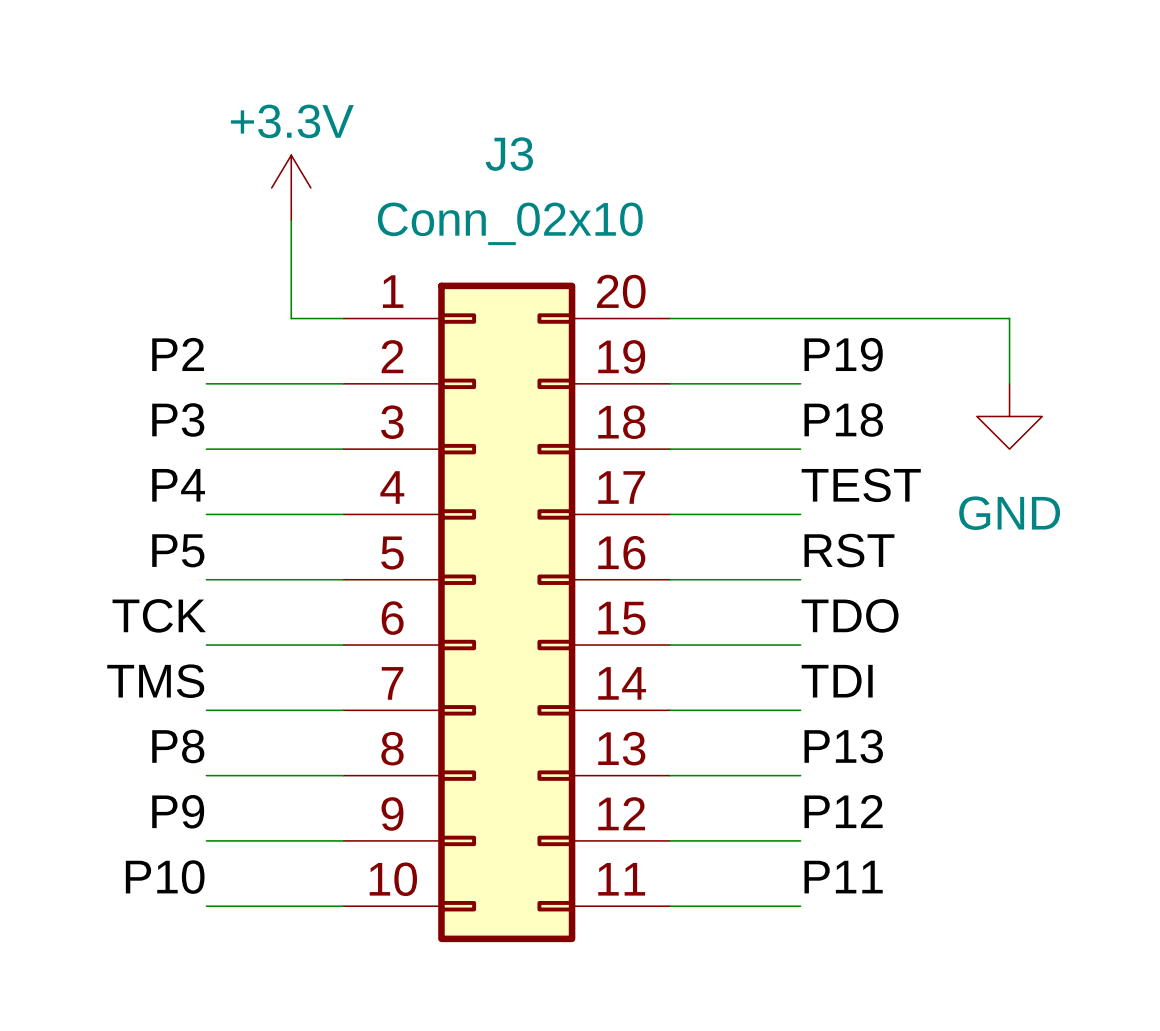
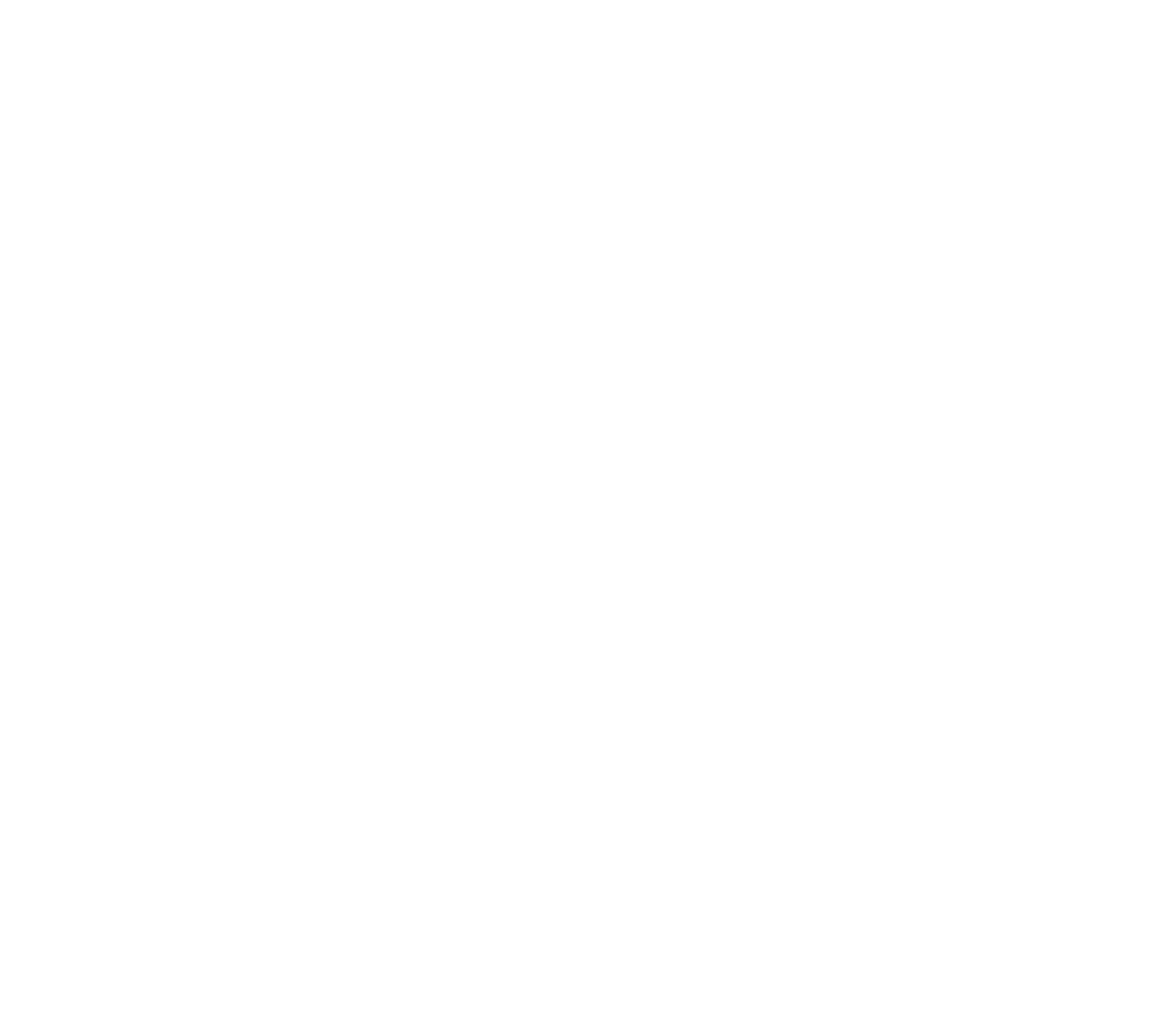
power symbol: +3.3V (291, 187) -> none
wire: (291, 220) (291, 318) (343, 318) -> none
wire: (670, 318) (1009, 318) (1009, 383) -> none
label: P2 (178, 354) -> none
label: P19 (843, 354) -> none
wire: (206, 383) (343, 383) -> none
wire: (670, 383) (800, 383) -> none
power symbol: GND (1009, 416) -> none
label: P3 (178, 419) -> none
label: P18 (843, 419) -> none
wire: (206, 449) (343, 449) -> none
wire: (670, 449) (800, 449) -> none
label: P4 (178, 485) -> none
label: TEST (861, 485) -> none
wire: (206, 514) (343, 514) -> none
wire: (670, 514) (800, 514) -> none
label: P5 (178, 550) -> none
label: RST (849, 550) -> none
wire: (206, 579) (343, 579) -> none
wire: (670, 579) (800, 579) -> none
J3: Conn_02x10 (506, 612) -> none
label: TCK (159, 615) -> none
label: TDO (850, 615) -> none
wire: (206, 645) (343, 645) -> none
wire: (670, 645) (800, 645) -> none
label: TMS (155, 681) -> none
label: TDI (837, 681) -> none
wire: (206, 710) (343, 710) -> none
wire: (670, 710) (800, 710) -> none
label: P8 (178, 746) -> none
label: P13 (843, 746) -> none
wire: (206, 775) (343, 775) -> none
wire: (670, 775) (800, 775) -> none
label: P9 (178, 811) -> none
label: P12 (843, 811) -> none
wire: (206, 840) (343, 840) -> none
wire: (670, 840) (800, 840) -> none
label: P10 (165, 877) -> none
label: P11 (843, 877) -> none
wire: (206, 906) (343, 906) -> none
wire: (670, 906) (800, 906) -> none

